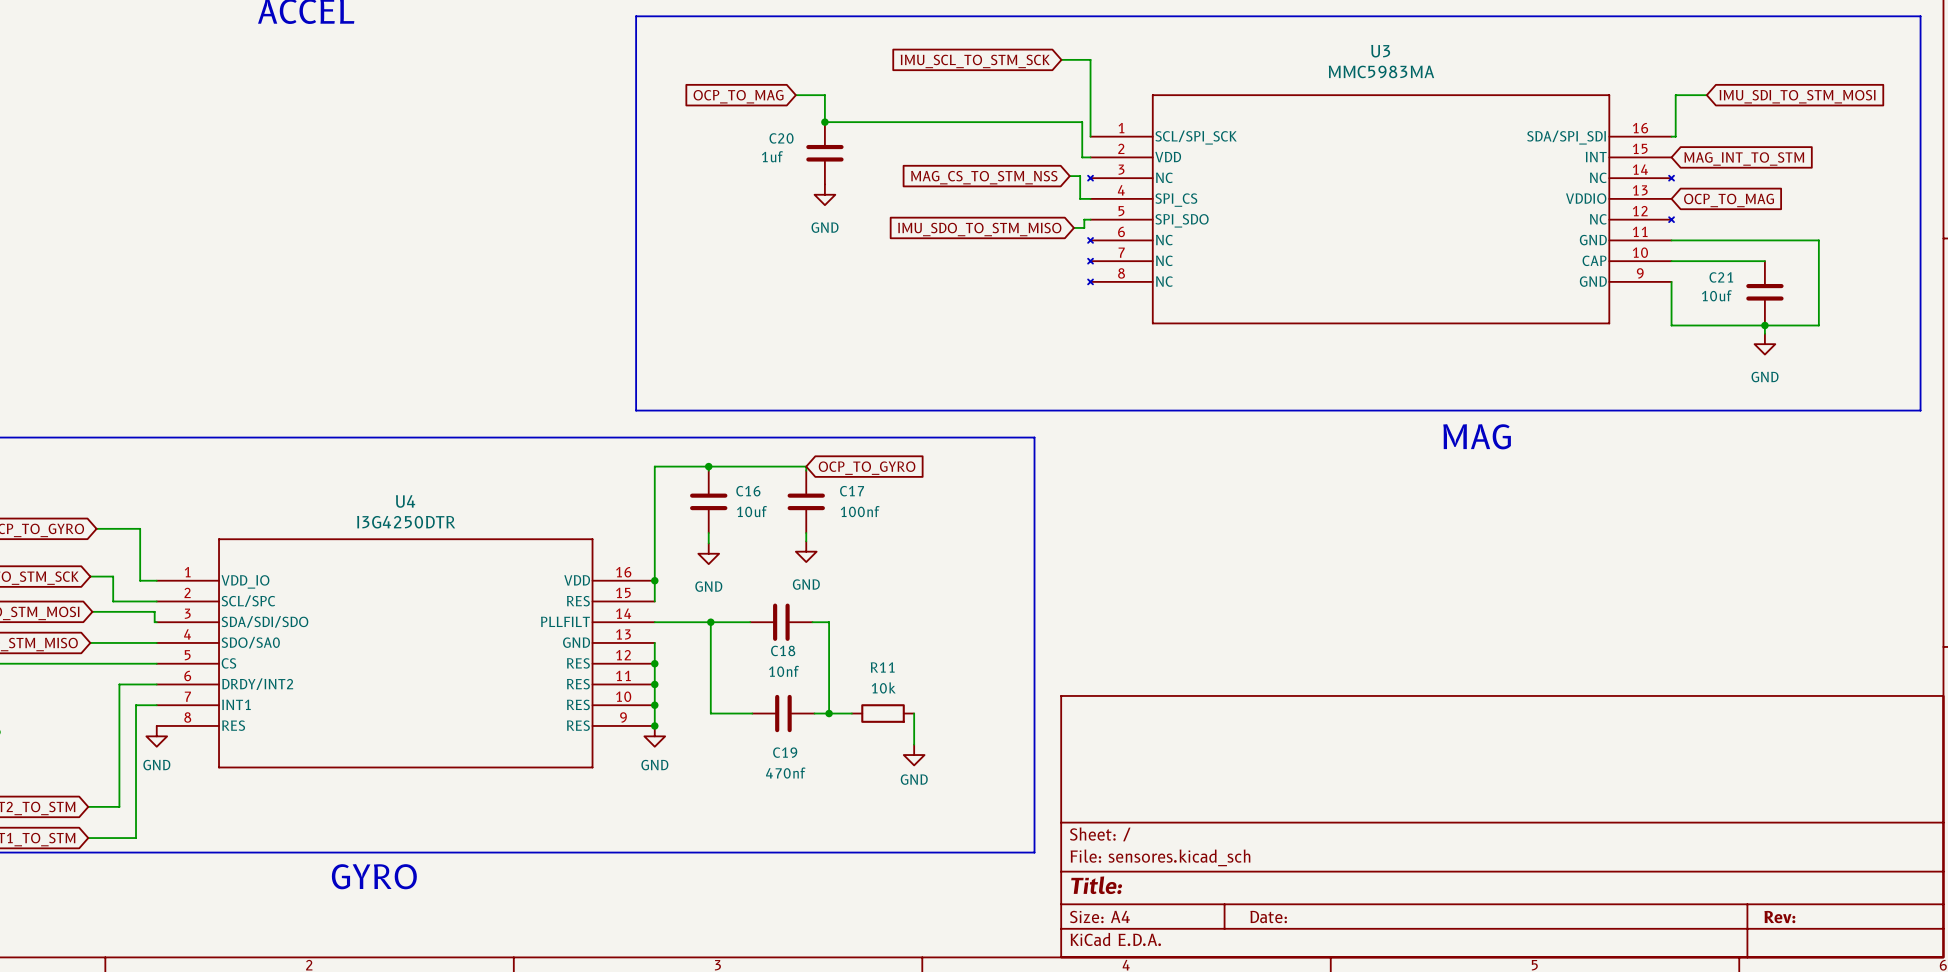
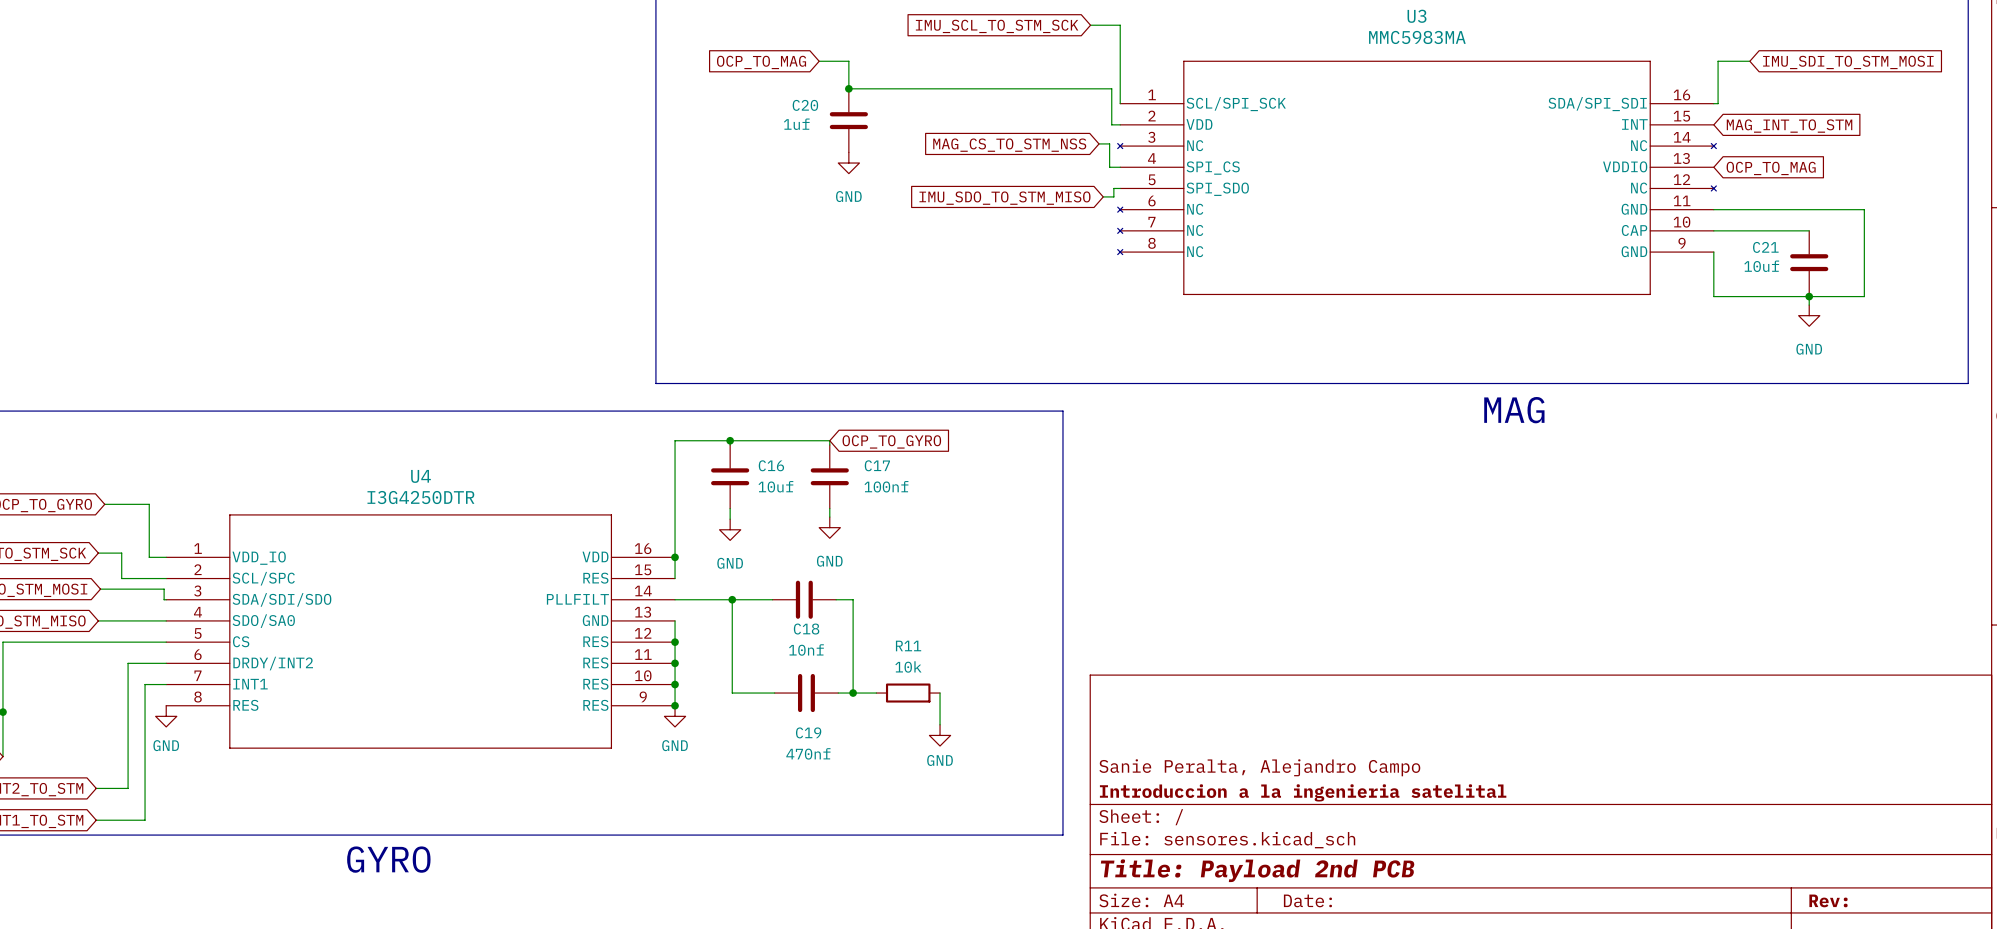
title block: none -> Sanie Peralta, Alejandro Campo (1259, 767)
title block: none -> Introduccion a la ingenieria satelital (1303, 792)
title block: Title: (1096, 885) -> Title: Payload 2nd PCB (1257, 870)

